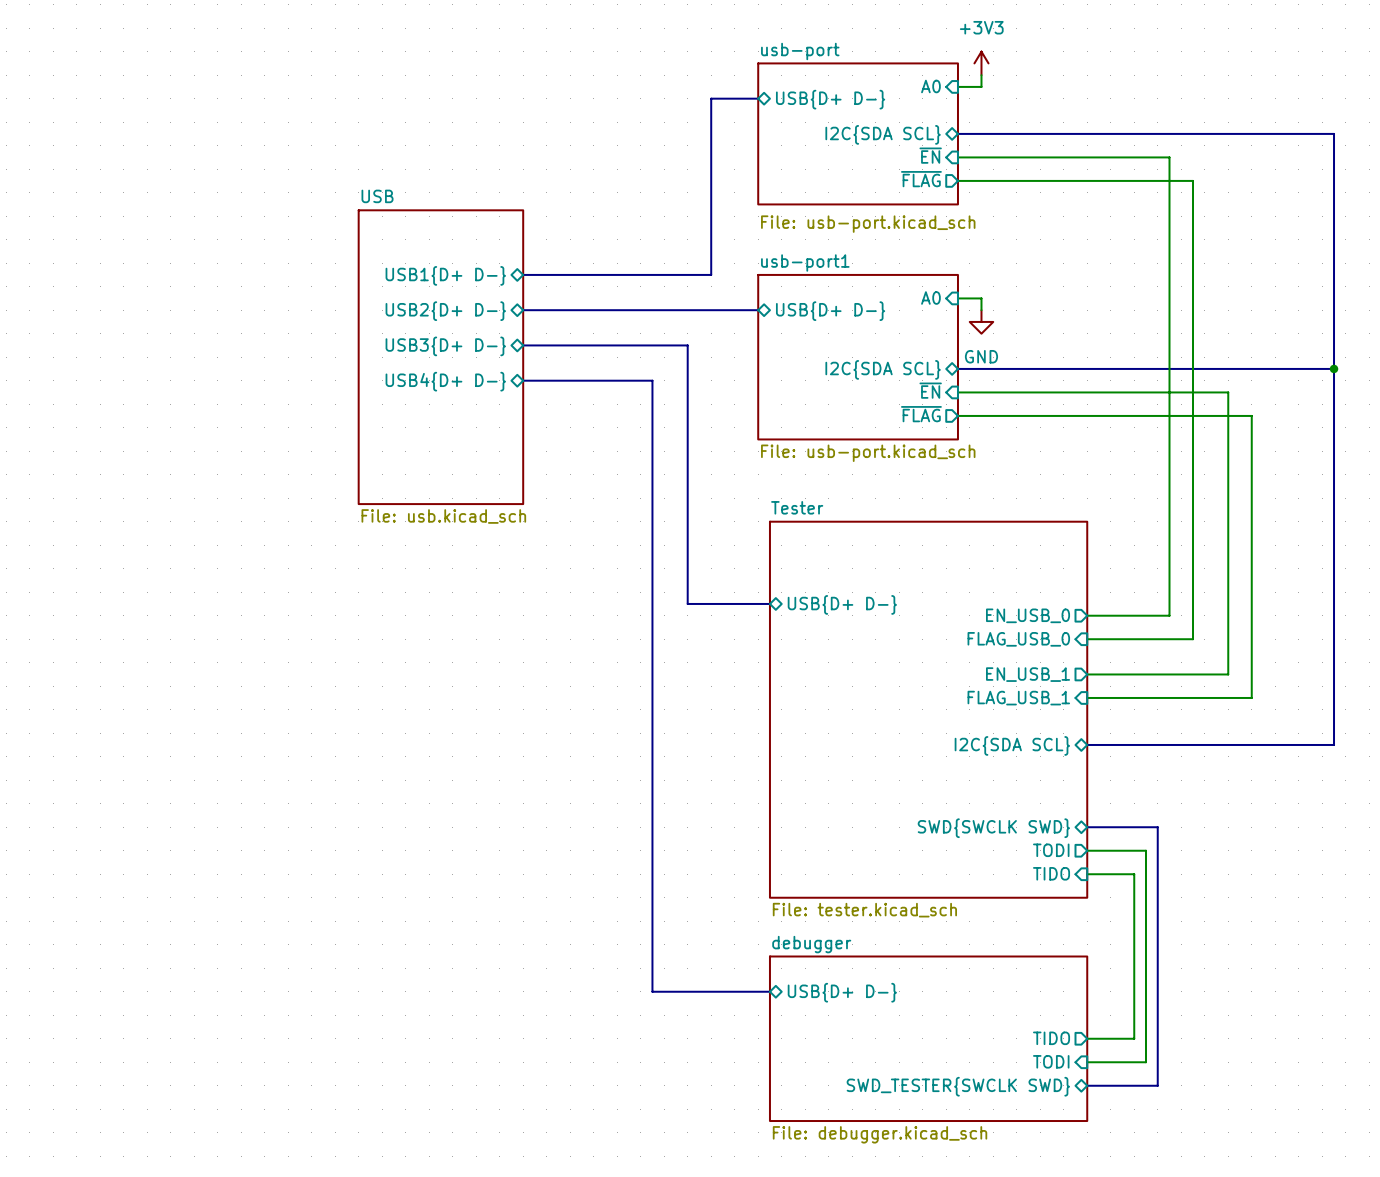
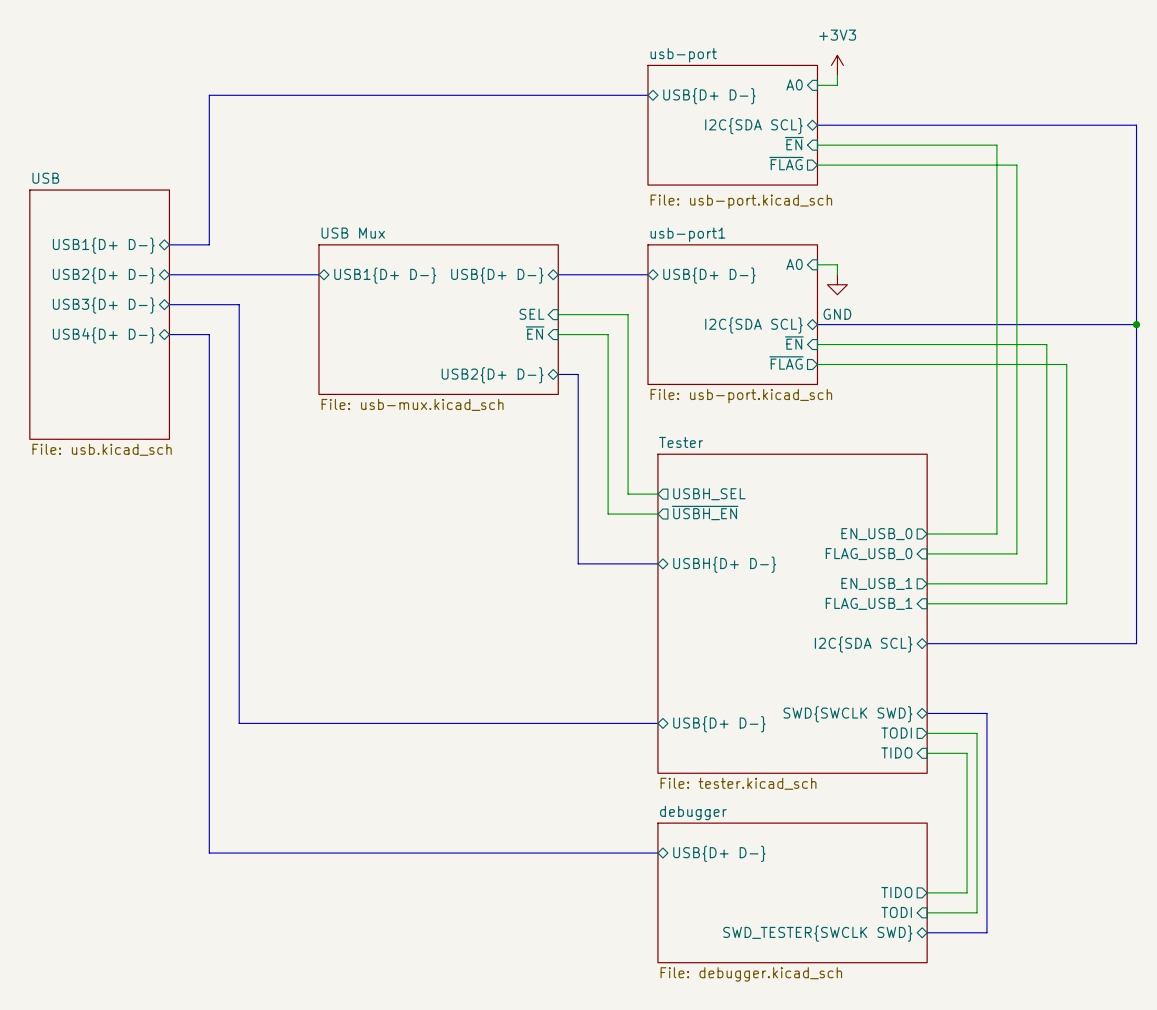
bus: (711, 98) (711, 274) (523, 274) -> (608, 95) (209, 95) (209, 244) (169, 244)
sheet pin: none -> USB1{D+ D-} (103, 245)
sheet pin rotation: 0° (445, 275) -> 180° (385, 275)
bus: none -> (169, 274) (318, 274)
bus: (523, 310) (652, 310) -> none
sheet pin: none -> USB2{D+ D-} (103, 275)
sheet pin: USB2{D+ D-} (445, 311) -> USB{D+ D-} (497, 275)
bus: none -> (169, 304) (239, 304) (239, 723) (657, 723)
bus: (523, 345) (687, 345) (687, 603) (769, 603) -> none
sheet pin: none -> USB3{D+ D-} (103, 305)
sheet pin: USB3{D+ D-} (445, 346) -> none
sheet pin: none -> SEL (531, 314)
sheet USB: none -> File: usb.kicad_sch (99, 314)
sheet USB: File: usb.kicad_sch (440, 357) -> none
wire: none -> (558, 314) (628, 314) (628, 494) (657, 494)
sheet USB Mux: none -> File: usb-mux.kicad_sch (438, 319)
sheet pin: none -> ~{EN} (535, 333)
bus: (523, 380) (652, 380) (652, 991) -> (169, 334) (209, 334) (209, 853) (558, 853)
wire: none -> (558, 334) (608, 334) (608, 514) (657, 514)
sheet pin: none -> USB4{D+ D-} (103, 335)
sheet pin: USB4{D+ D-} (445, 381) -> none
bus: none -> (558, 374) (578, 374) (578, 563) (657, 563)
sheet pin: none -> USB2{D+ D-} (492, 375)
sheet pin: none -> USBH_SEL (709, 494)
sheet pin: none -> ~{USBH_EN} (705, 513)
sheet pin: USB{D+ D-} (842, 604) -> none
sheet pin: none -> USBH{D+ D-} (724, 564)
sheet pin: none -> USB{D+ D-} (719, 724)

